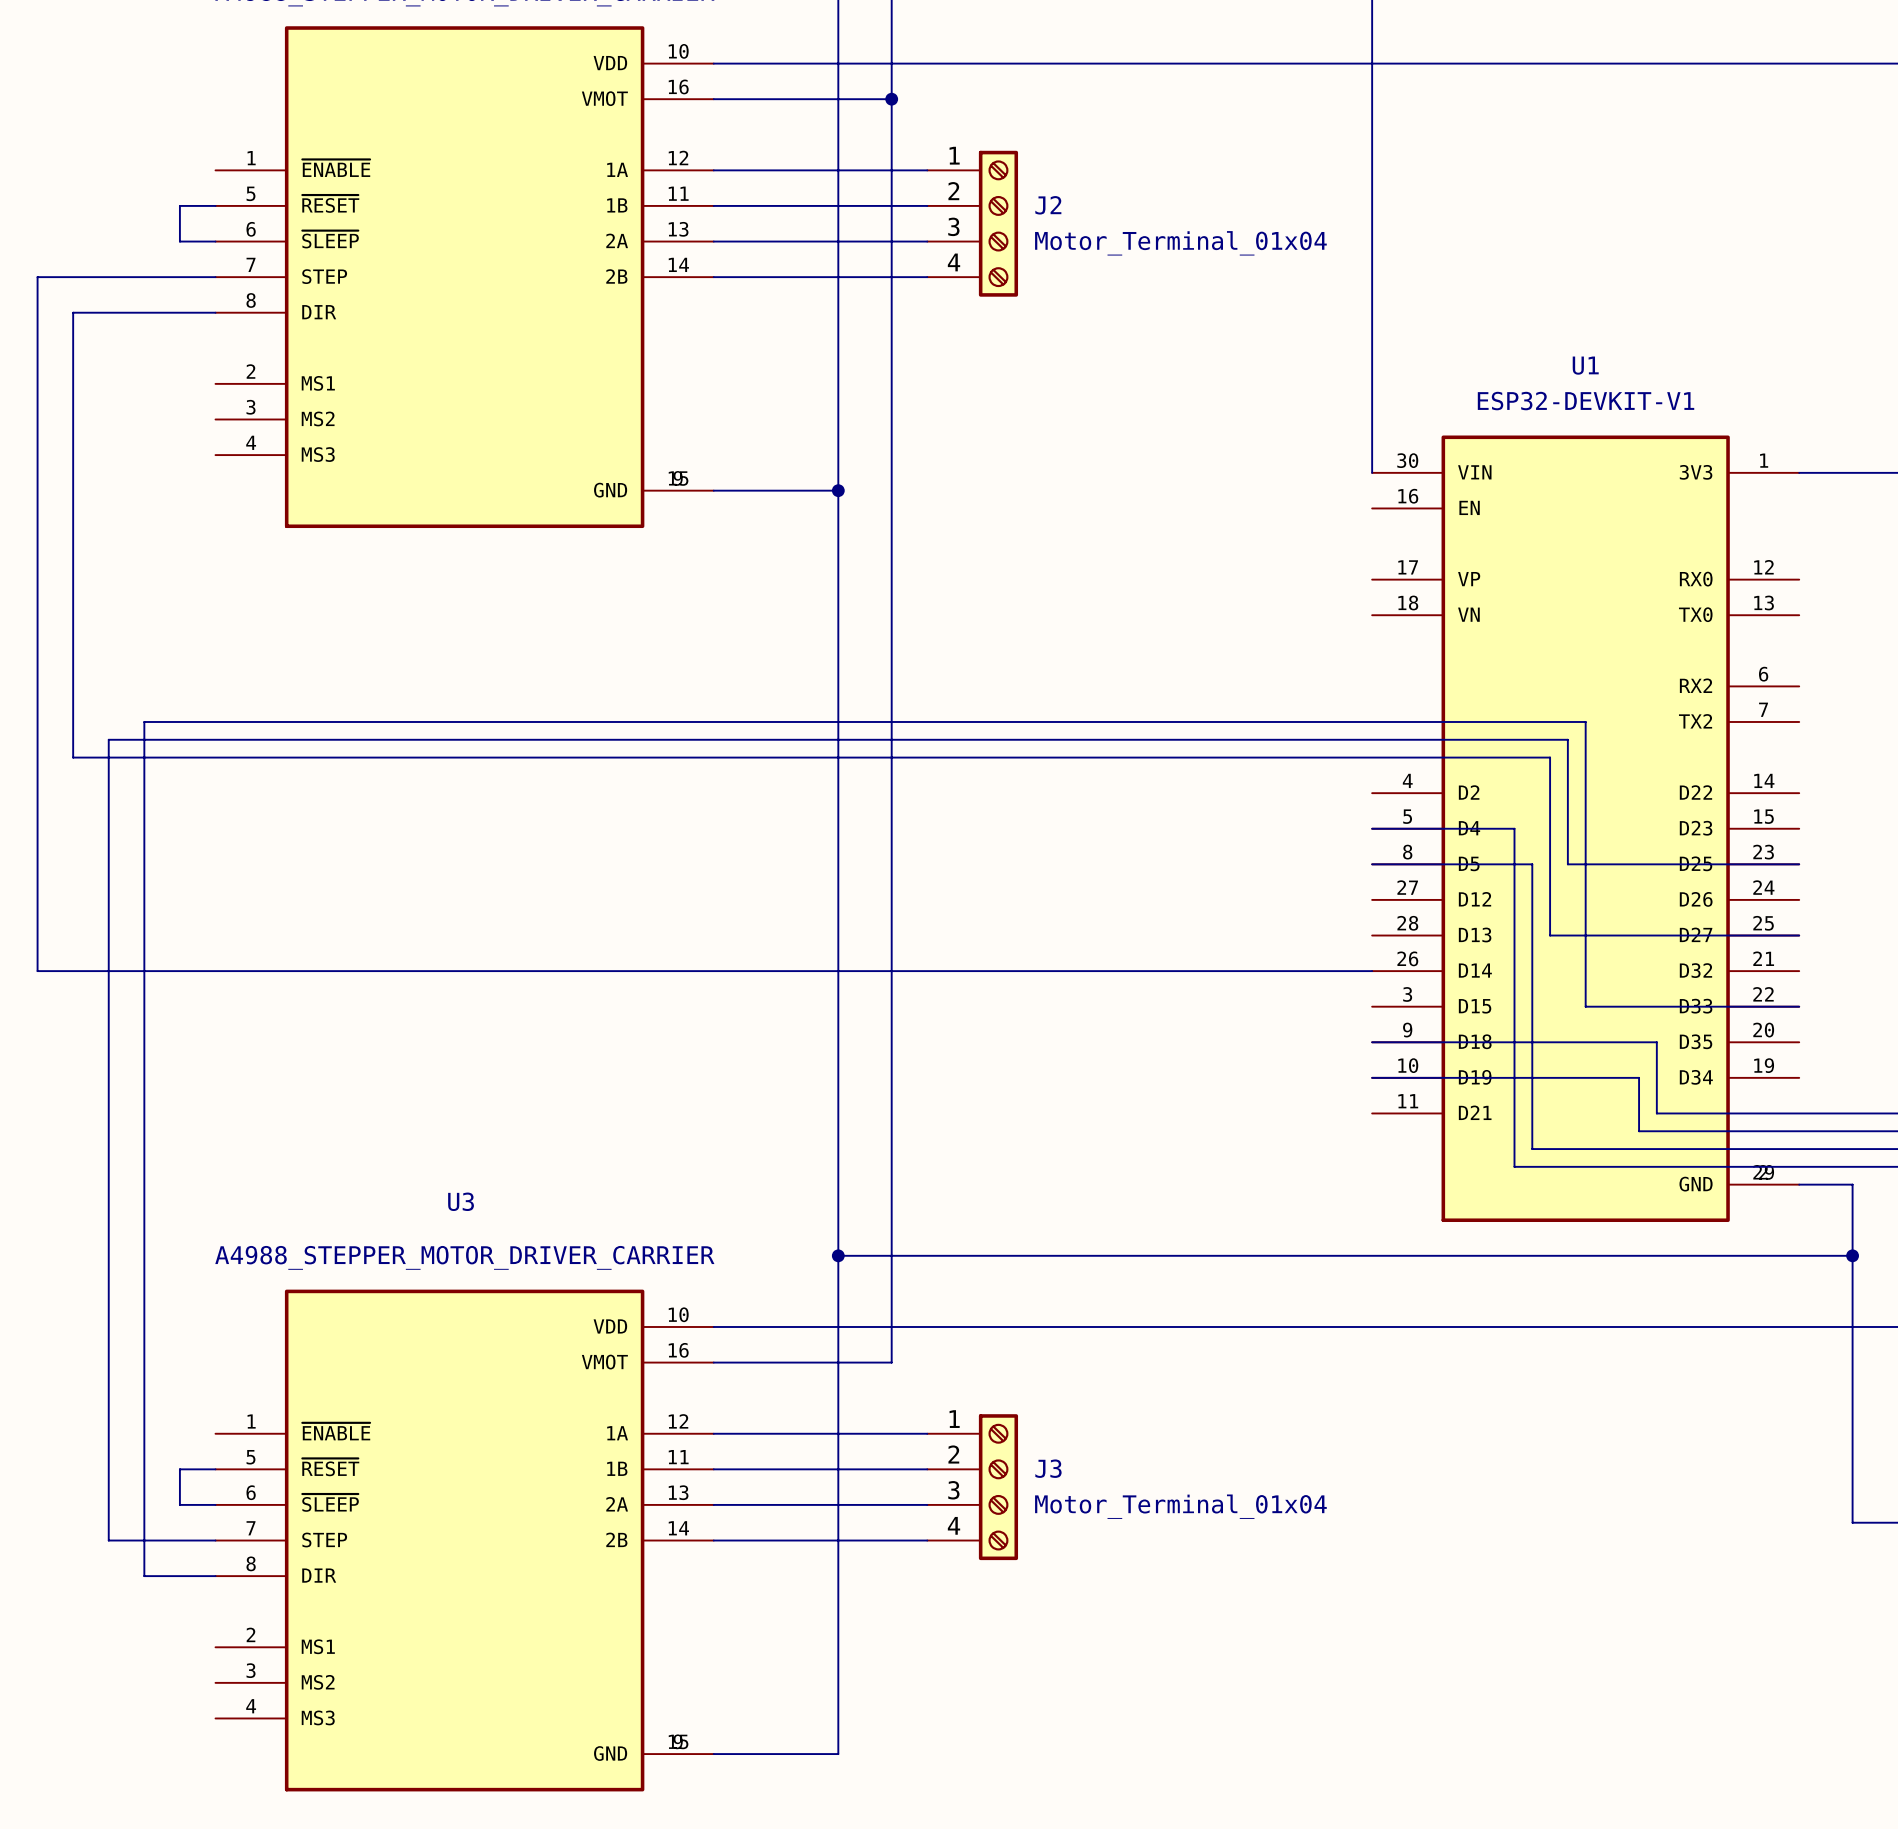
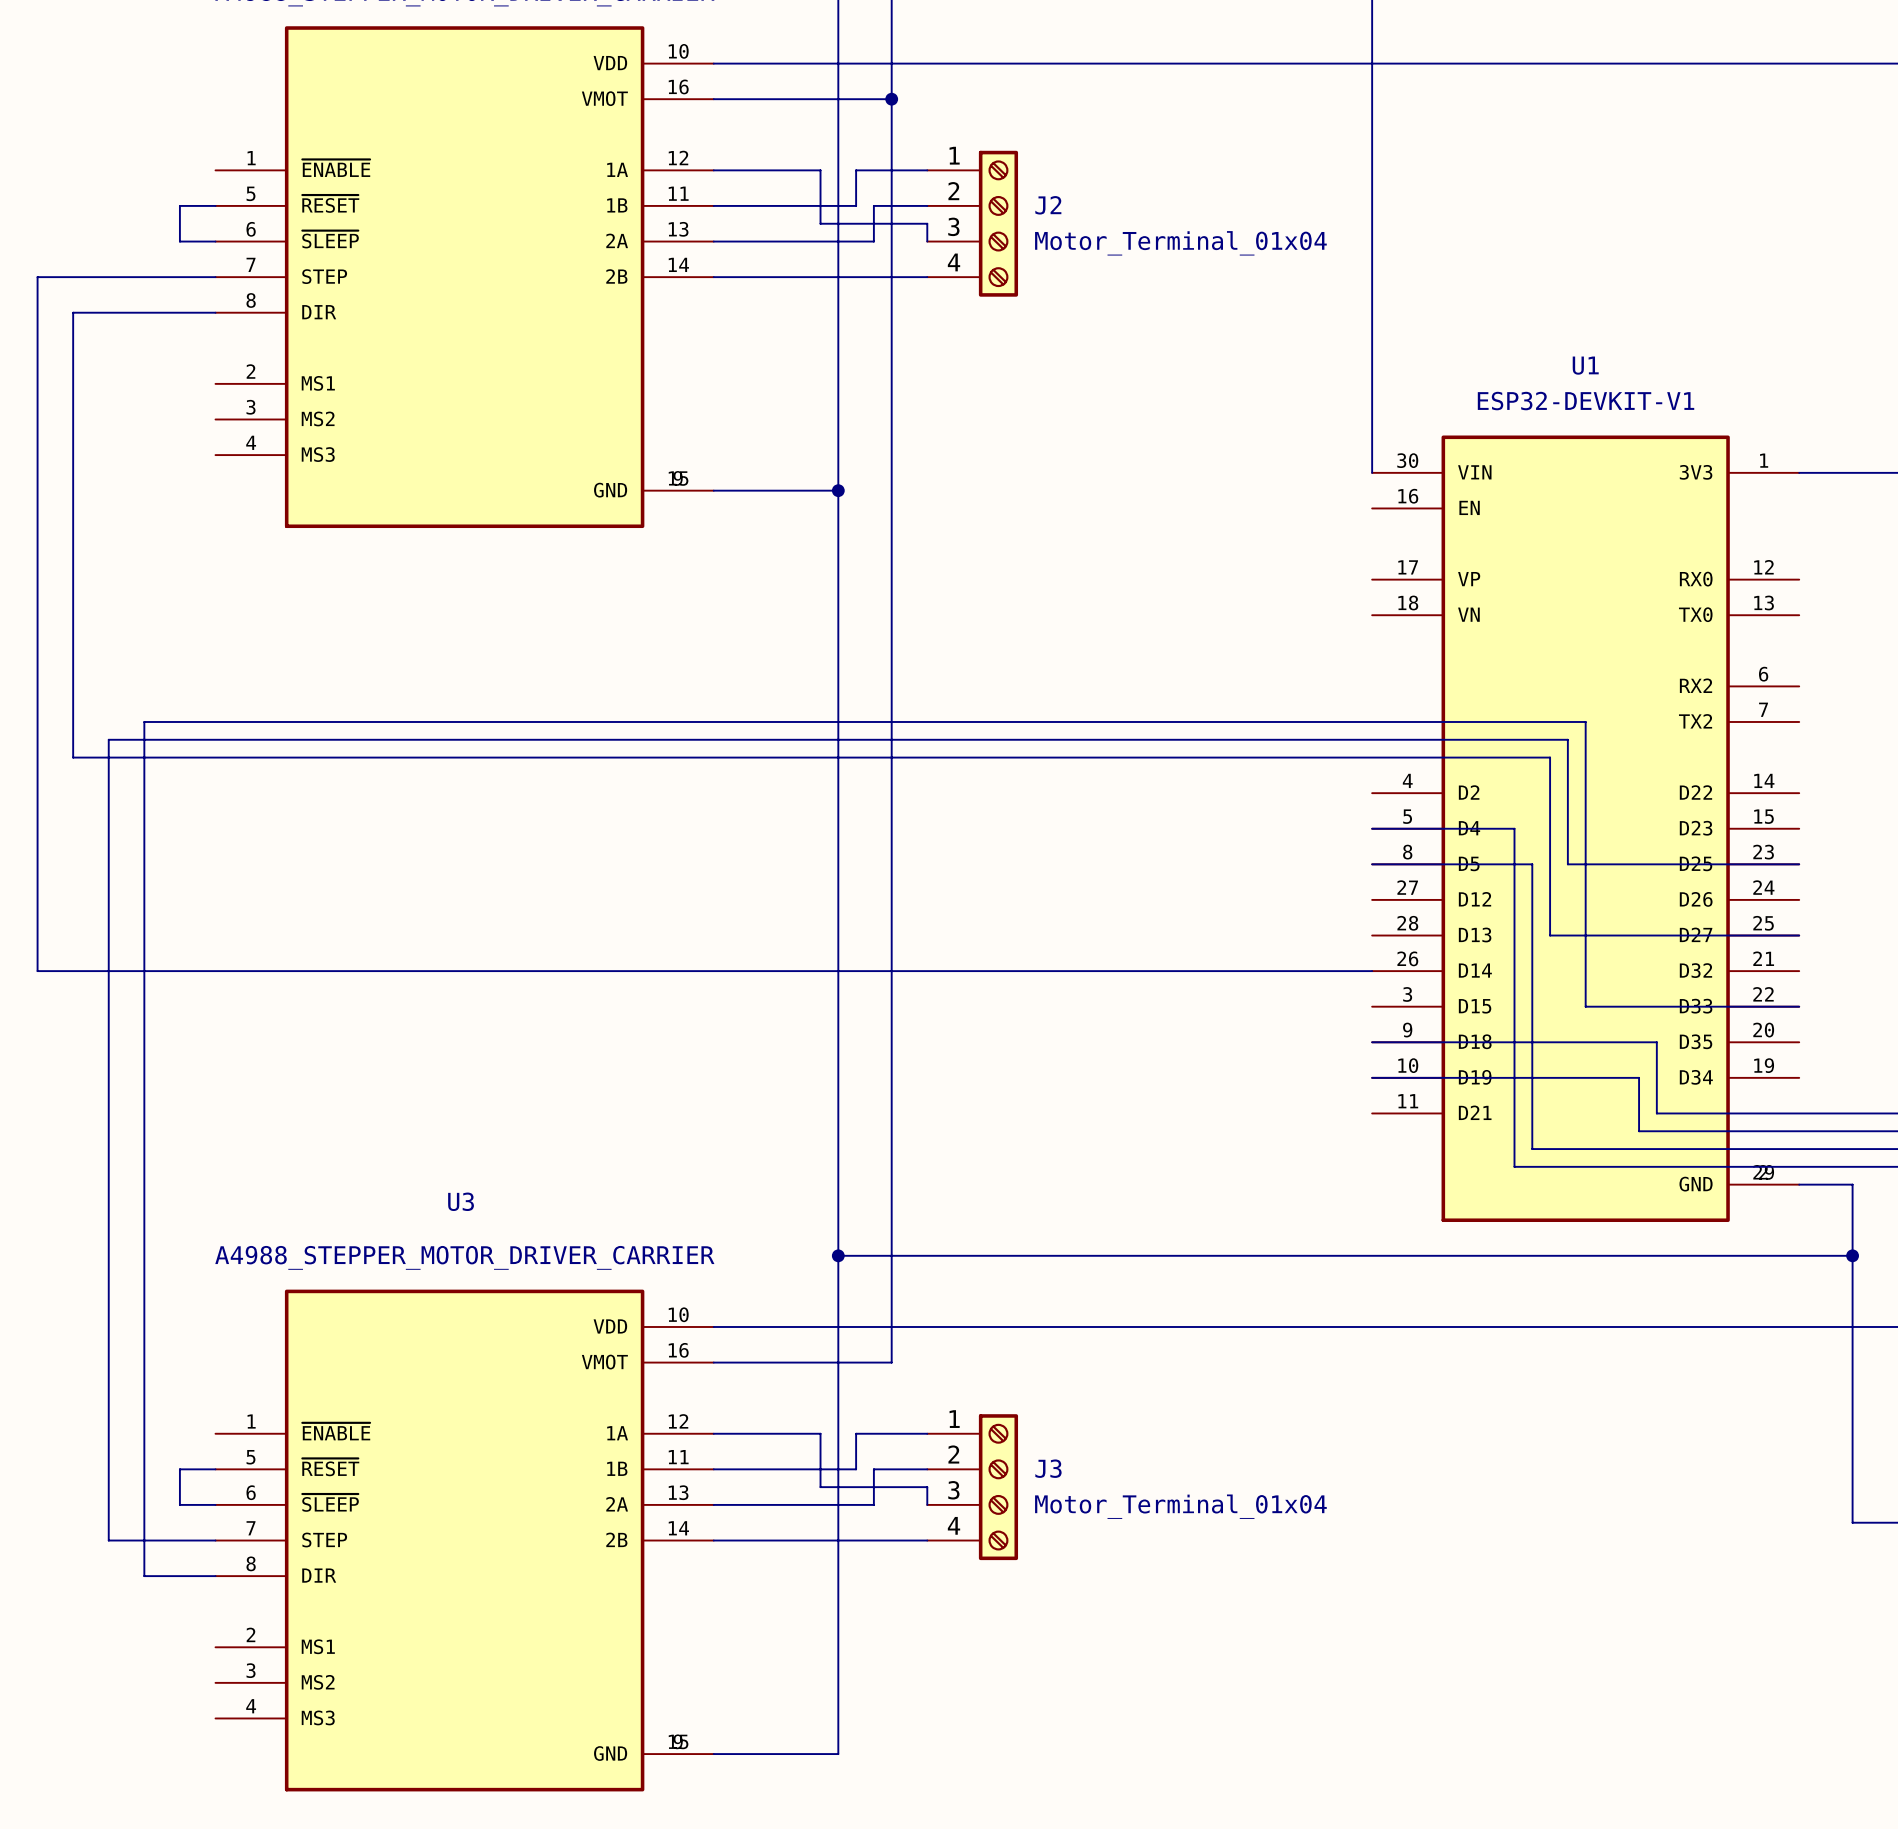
wire: (820, 170) (856, 170) -> (820, 170) (820, 223) (927, 223) (927, 241)
wire: (856, 205) (873, 205) -> (856, 205) (856, 170)
wire: (873, 241) (927, 241) -> (873, 241) (873, 205)
wire: (820, 1433) (856, 1433) -> (856, 1469) (856, 1433)
wire: (856, 1469) (873, 1469) -> (873, 1504) (873, 1469)
wire: (873, 1504) (927, 1504) -> (820, 1433) (820, 1487) (927, 1487) (927, 1504)

